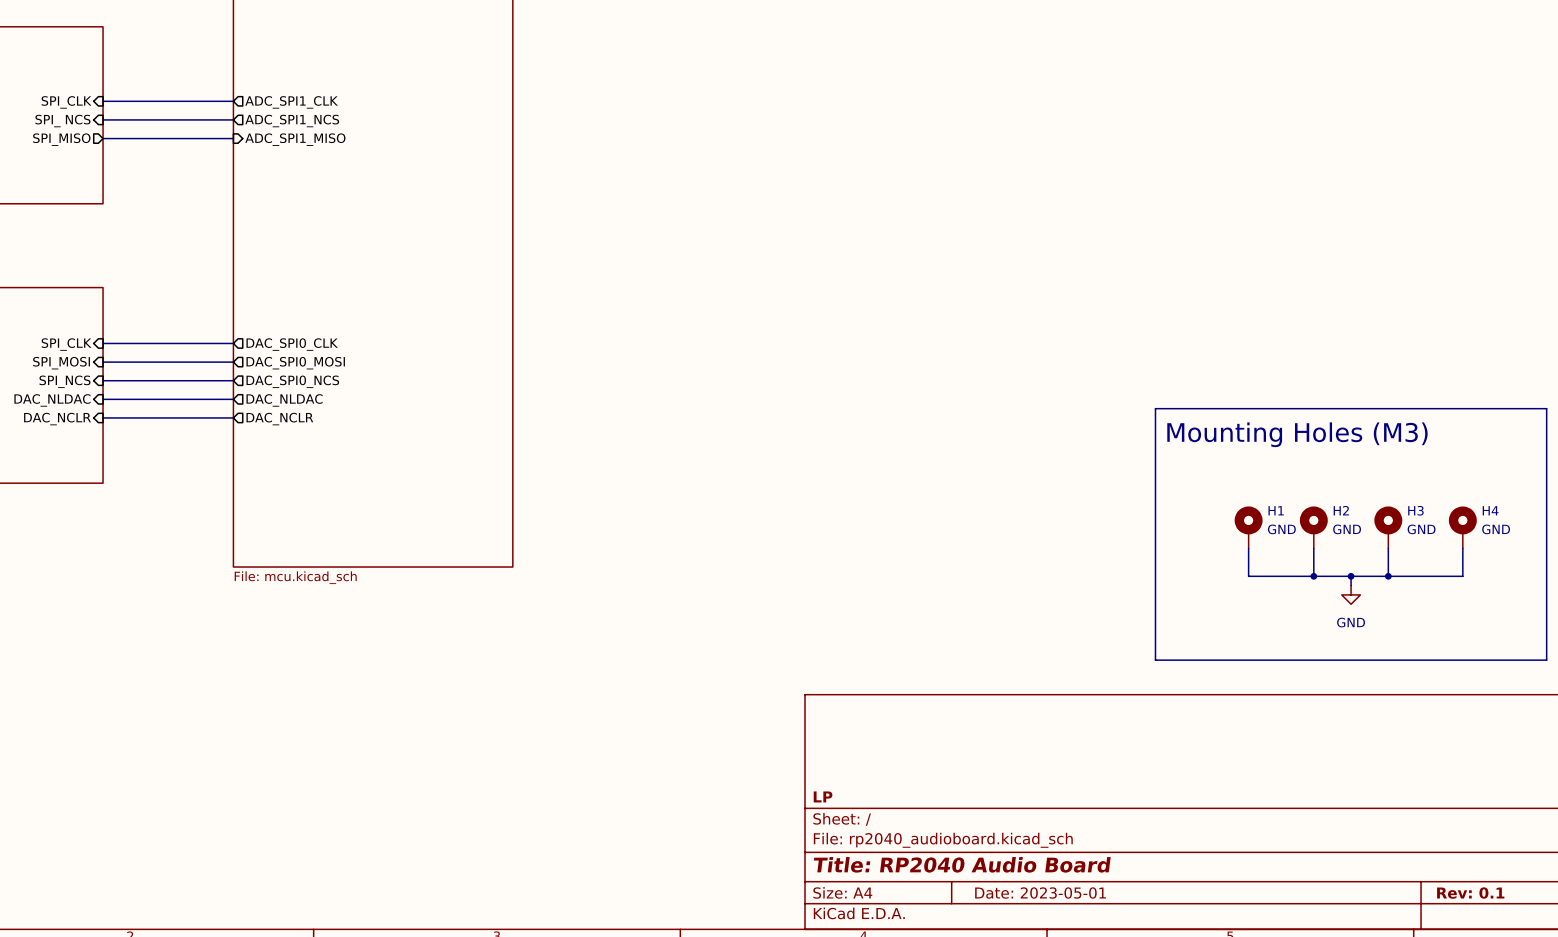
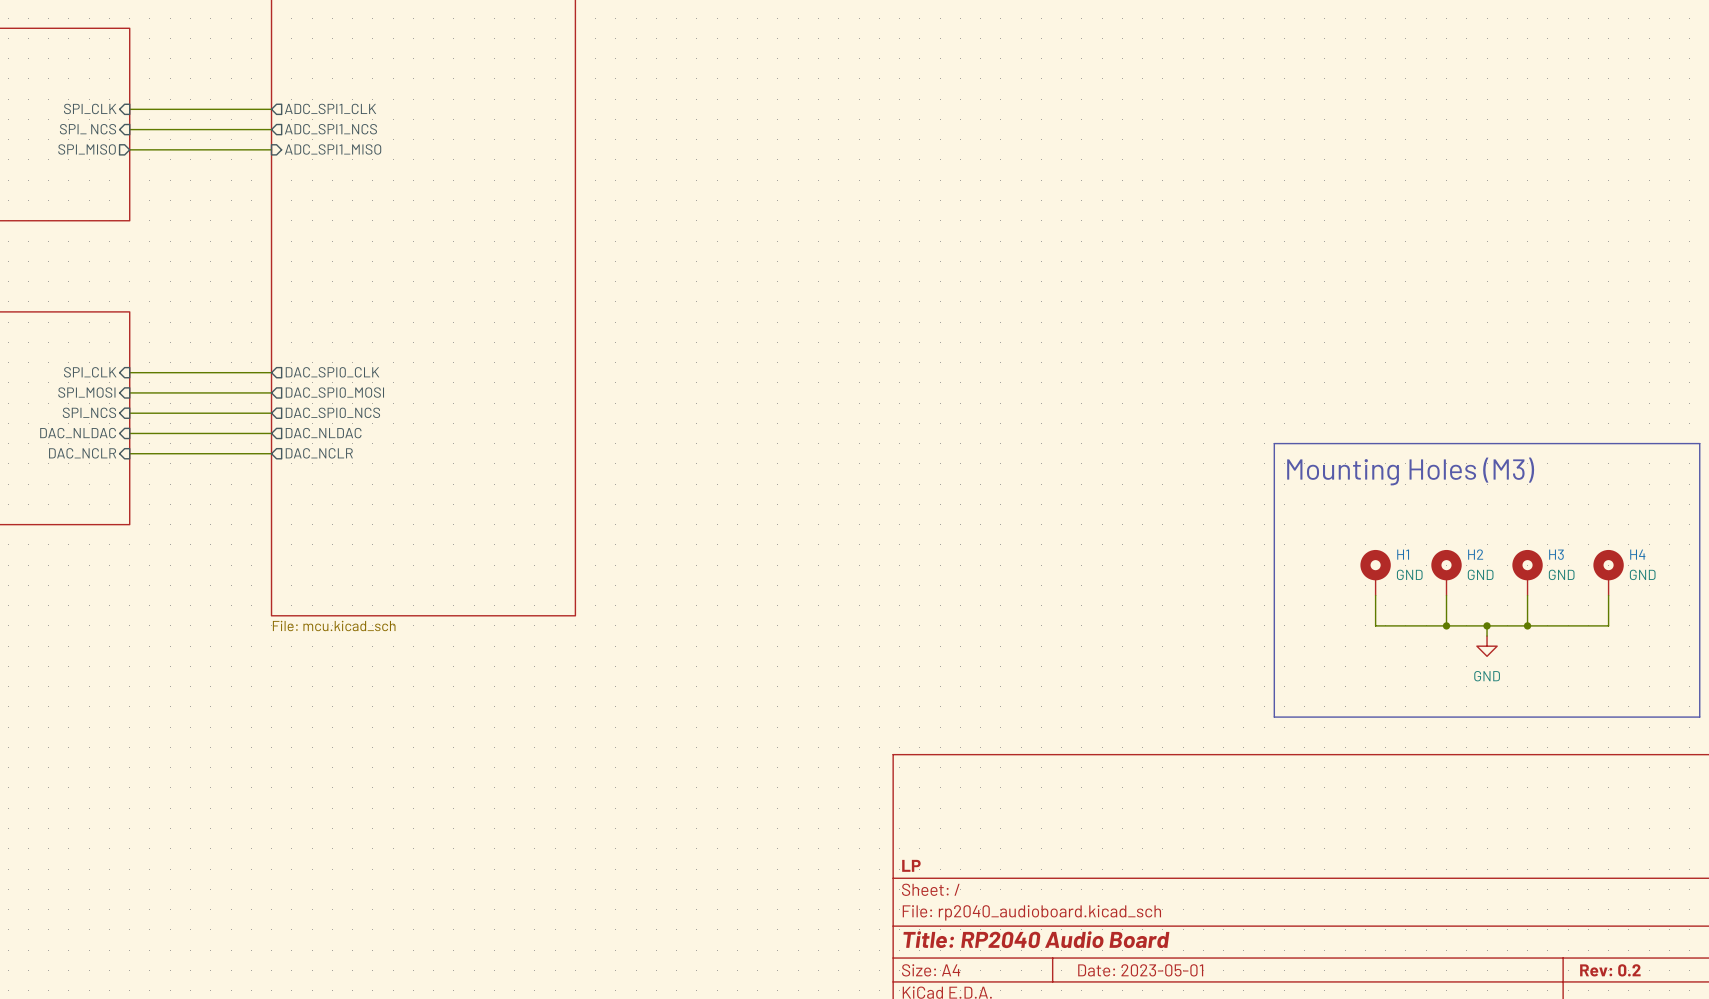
title block: Rev: 0.1 (1470, 893) -> Rev: 0.2 (1610, 970)

